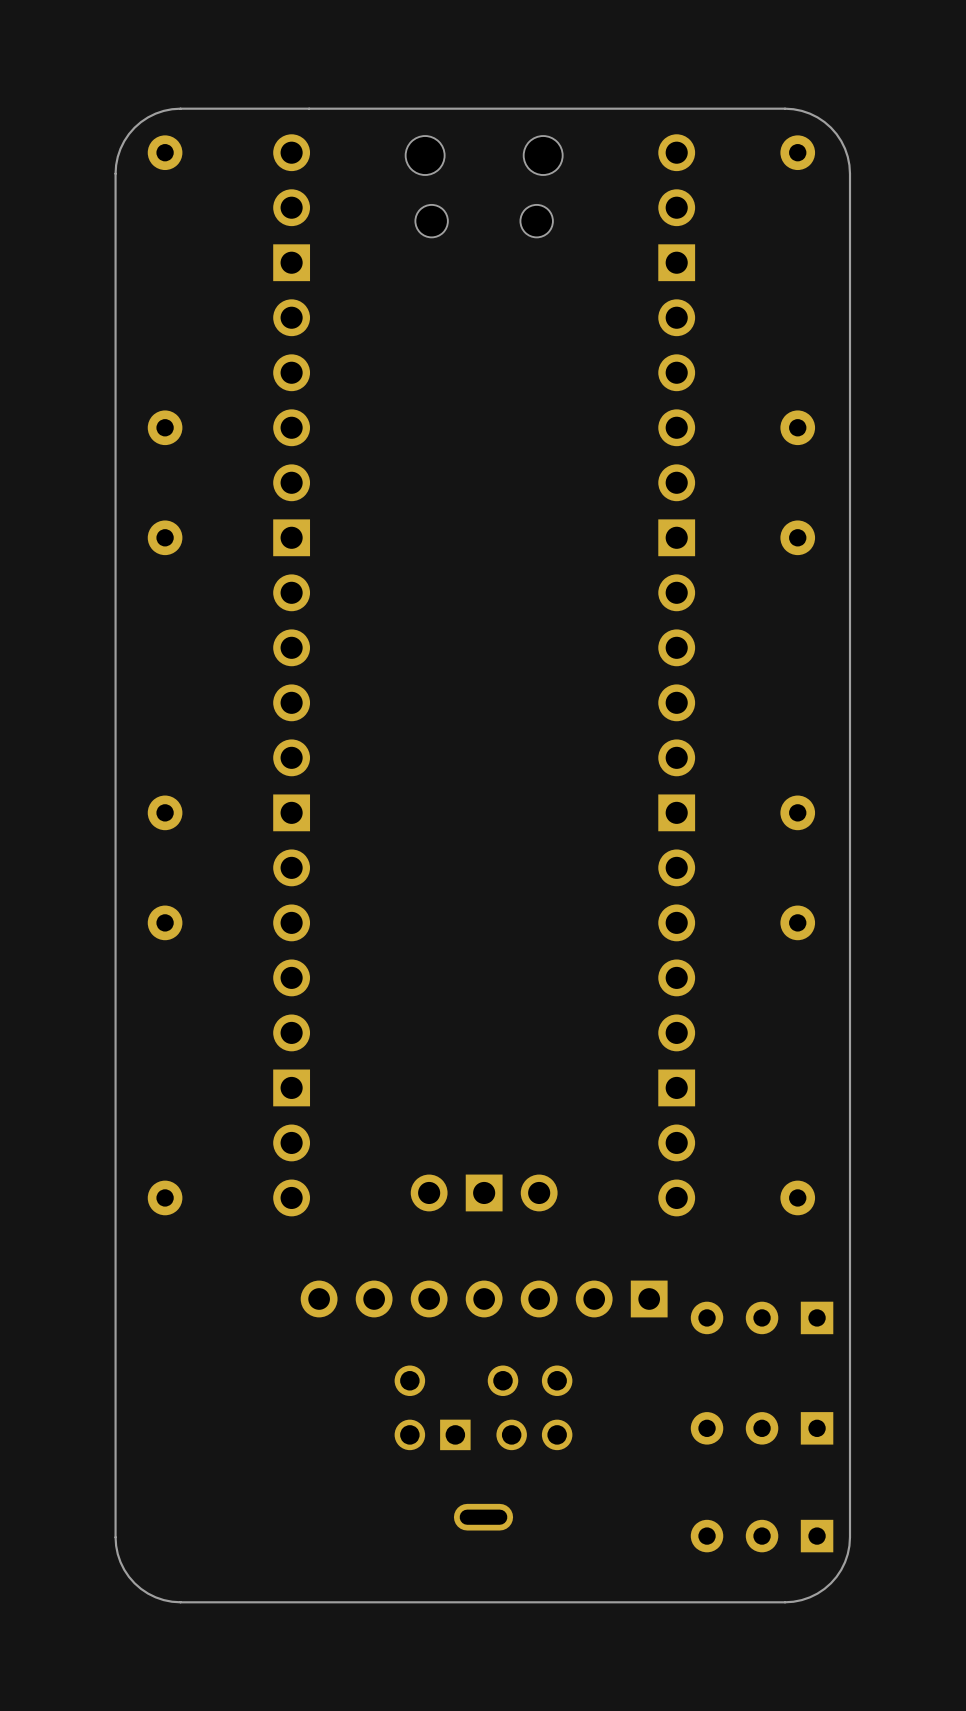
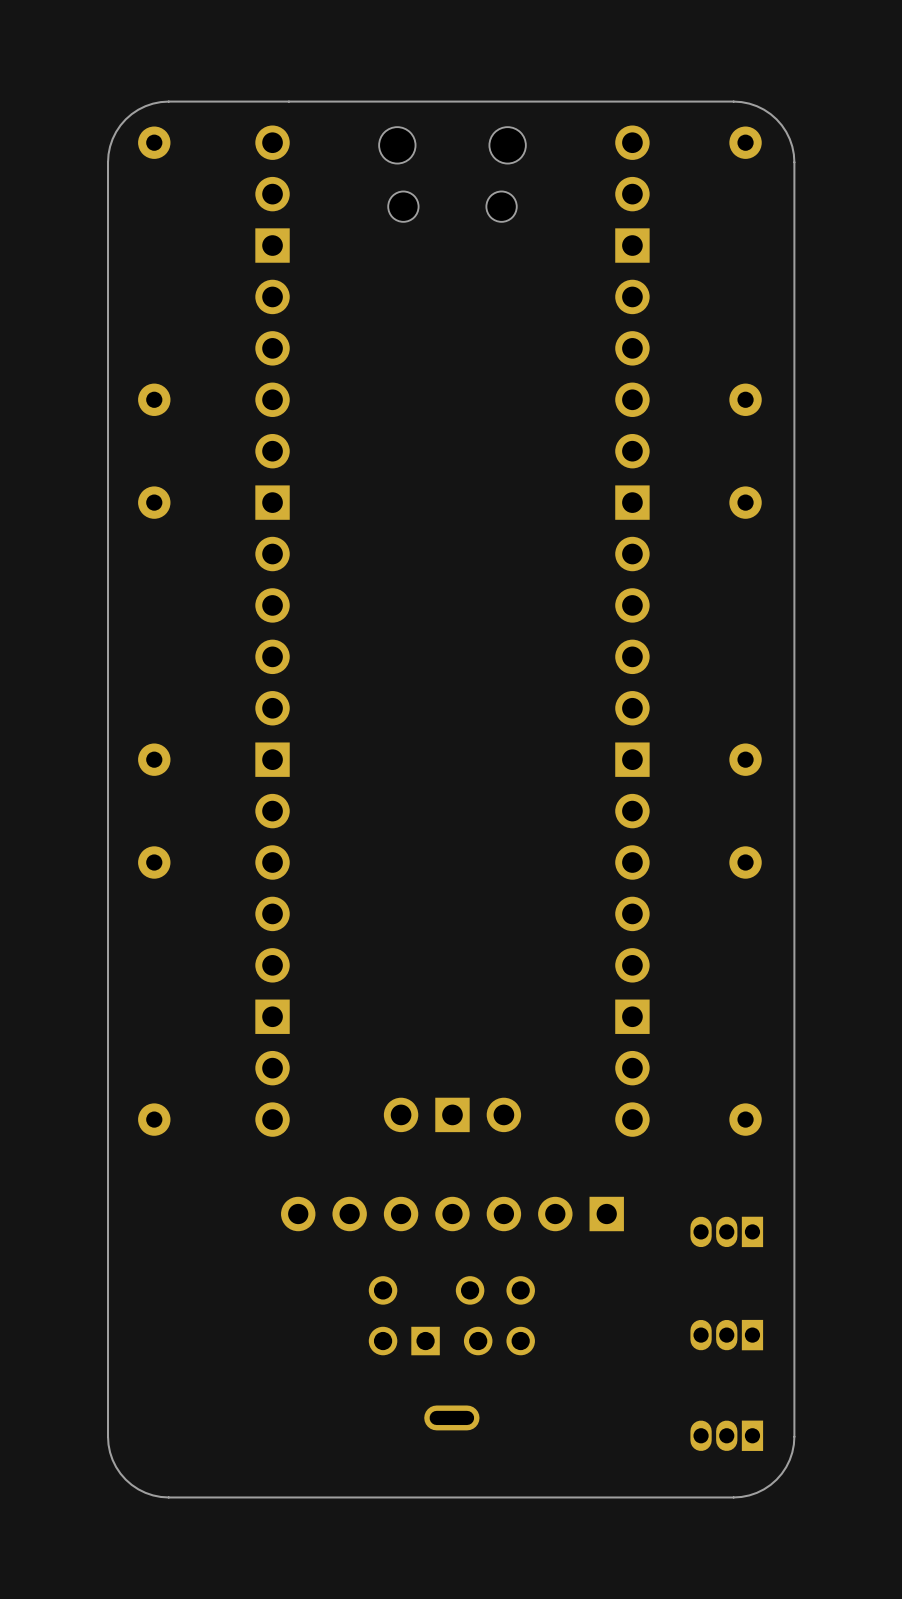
part footprint: [690, 1301, 834, 1335] -> [690, 1216, 764, 1248]
part footprint: [690, 1412, 834, 1445] -> [690, 1319, 764, 1351]
part footprint: [690, 1519, 834, 1553] -> [690, 1420, 764, 1451]

